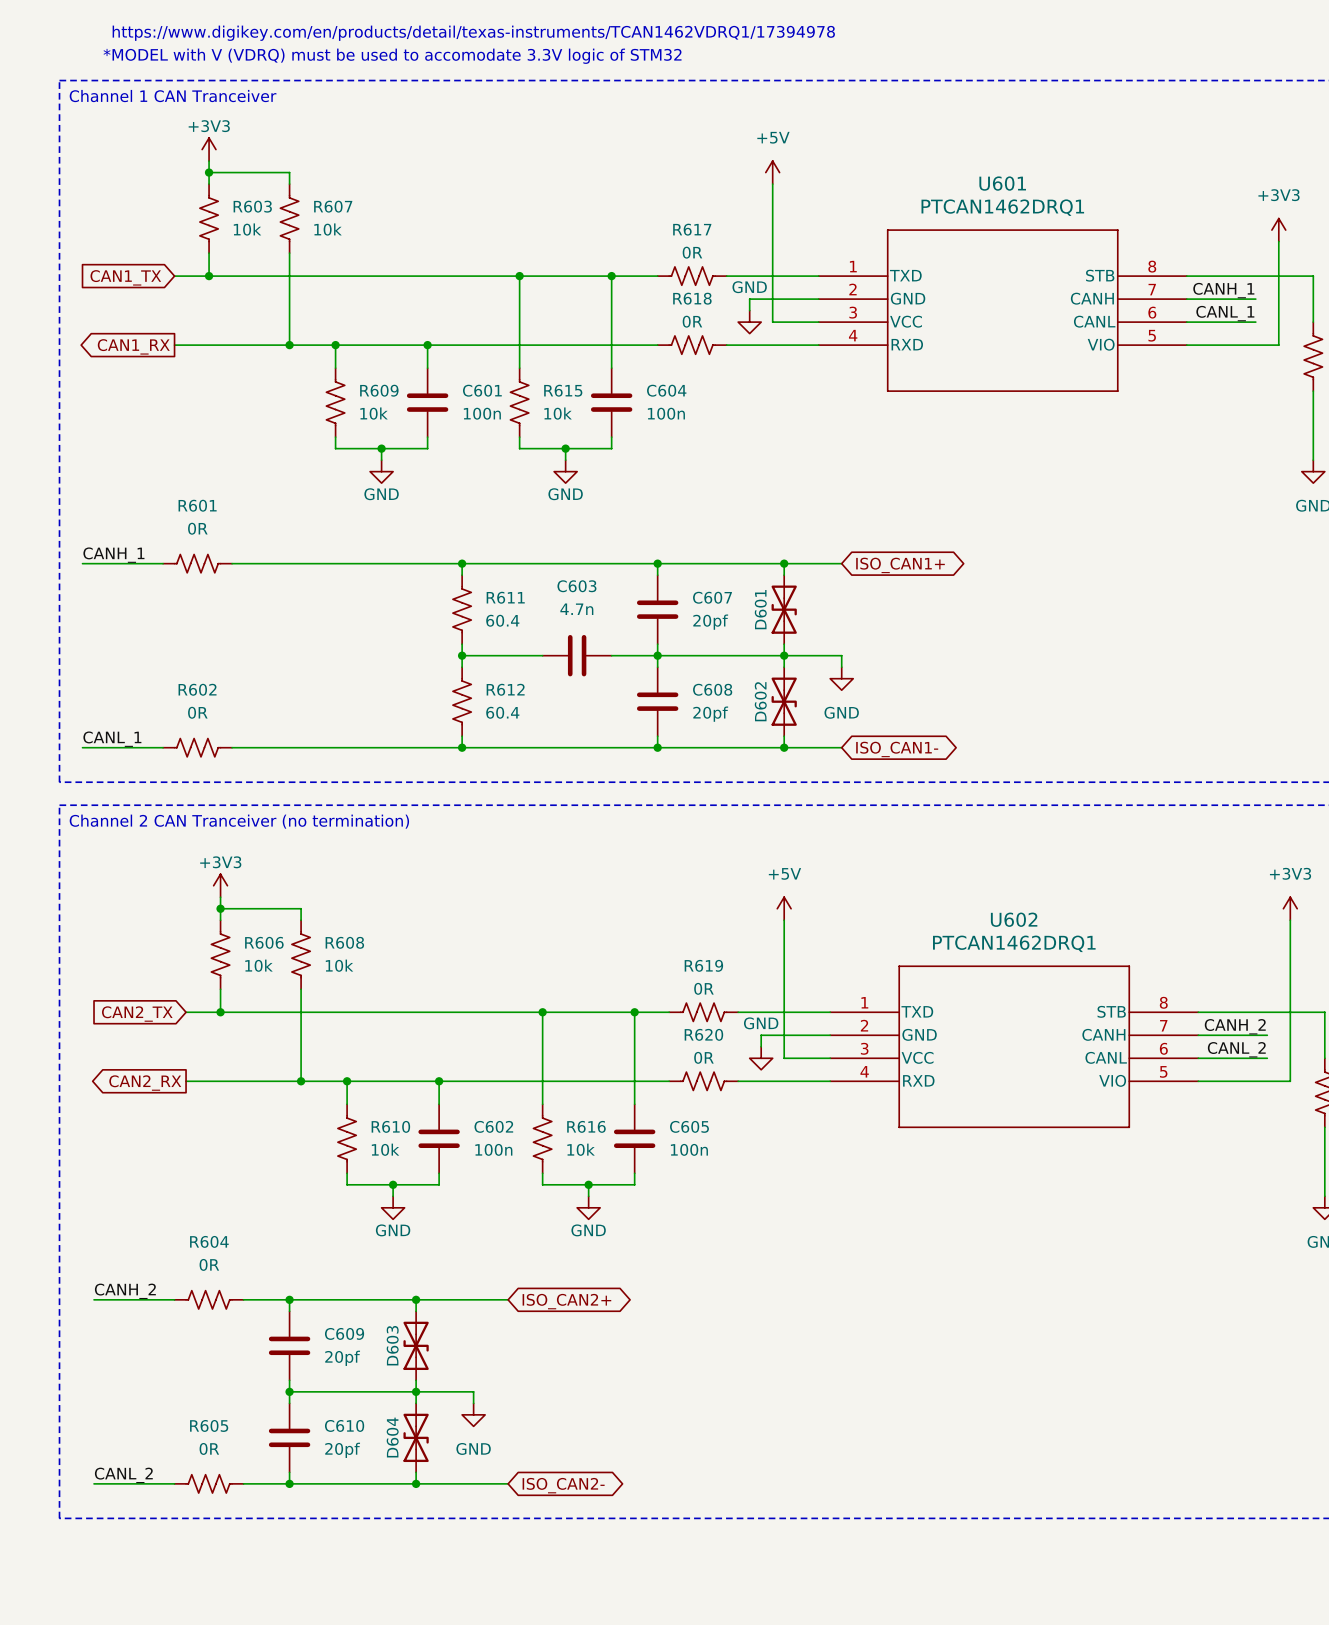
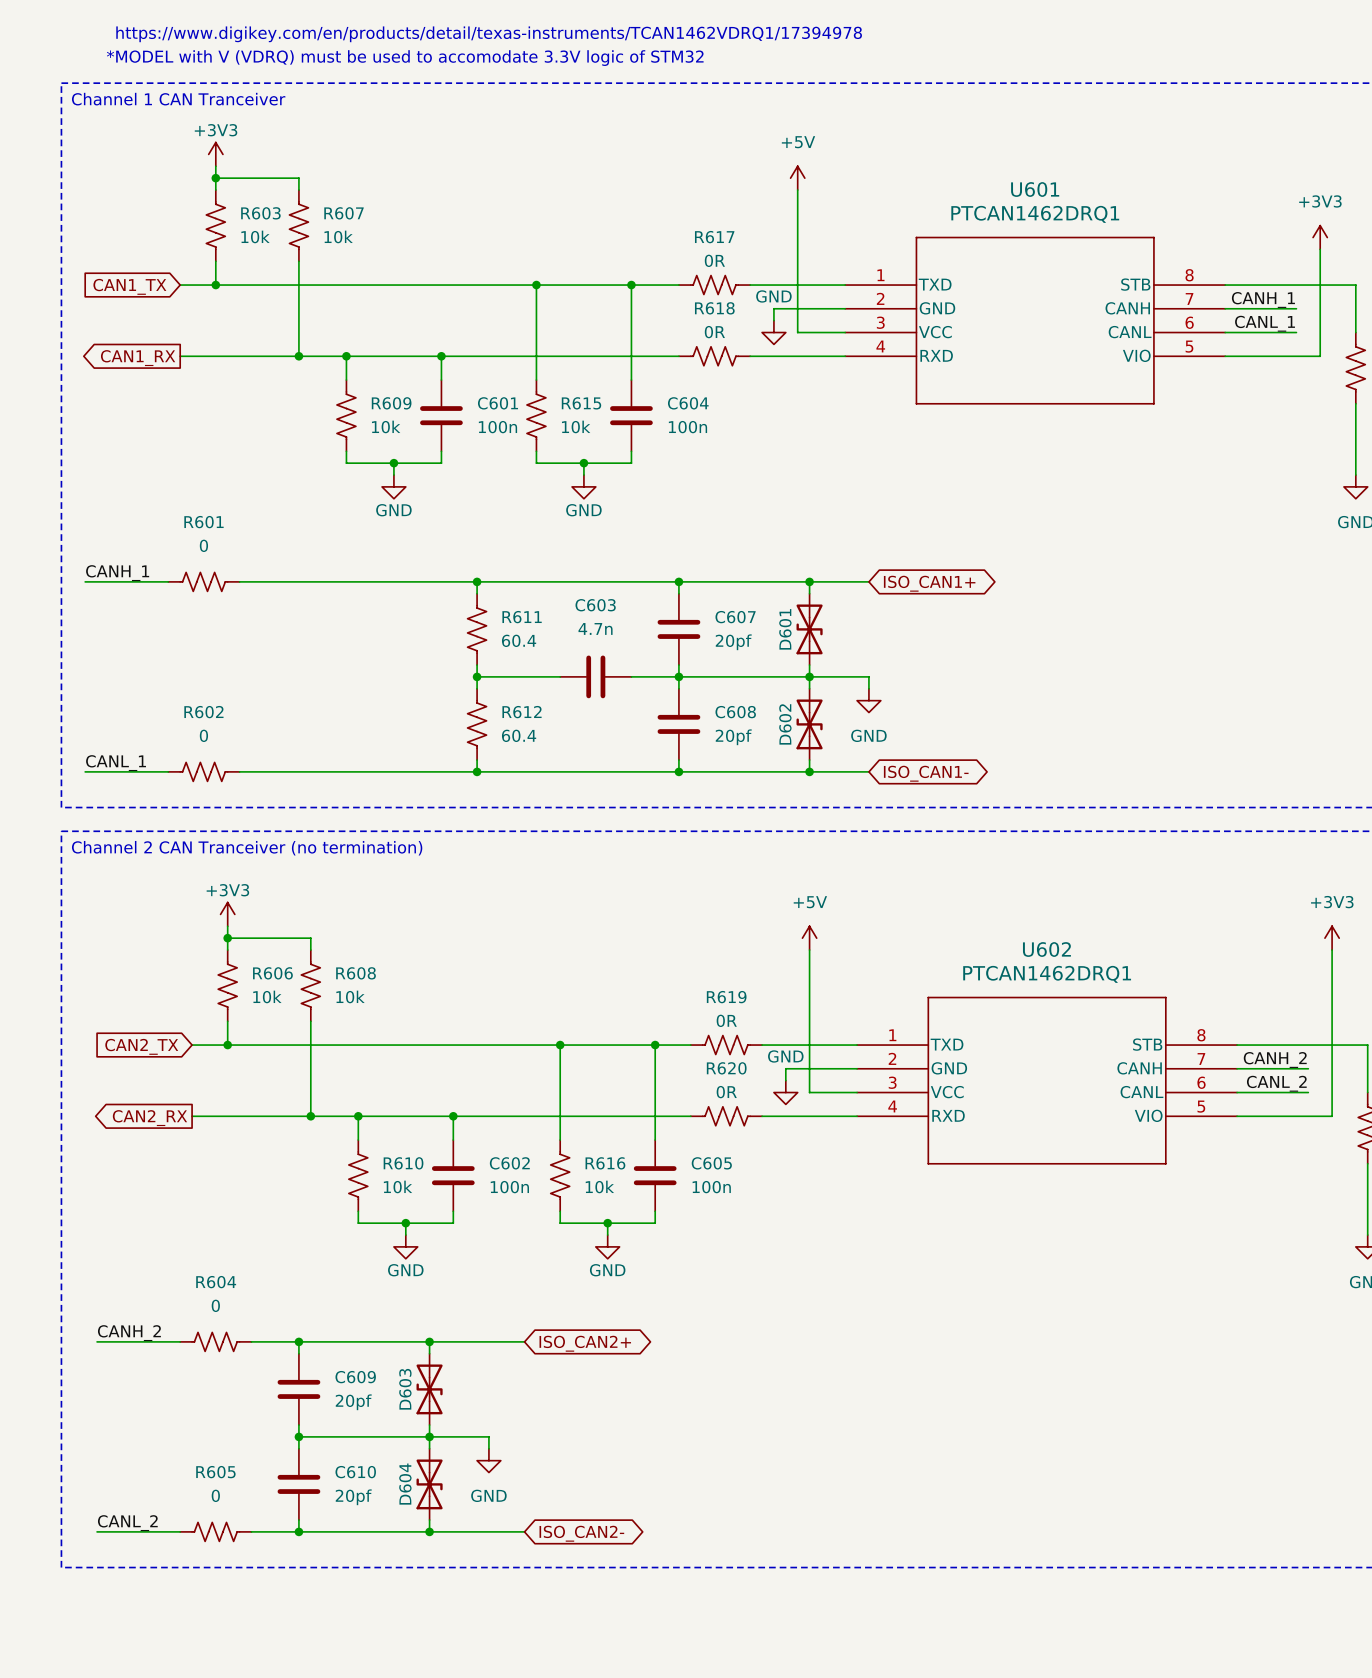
R601 value: 0R (197, 528) -> 0 (203, 545)
R602 value: 0R (197, 712) -> 0 (203, 735)
R604 value: 0R (209, 1264) -> 0 (215, 1305)
R605 value: 0R (209, 1448) -> 0 (215, 1495)

